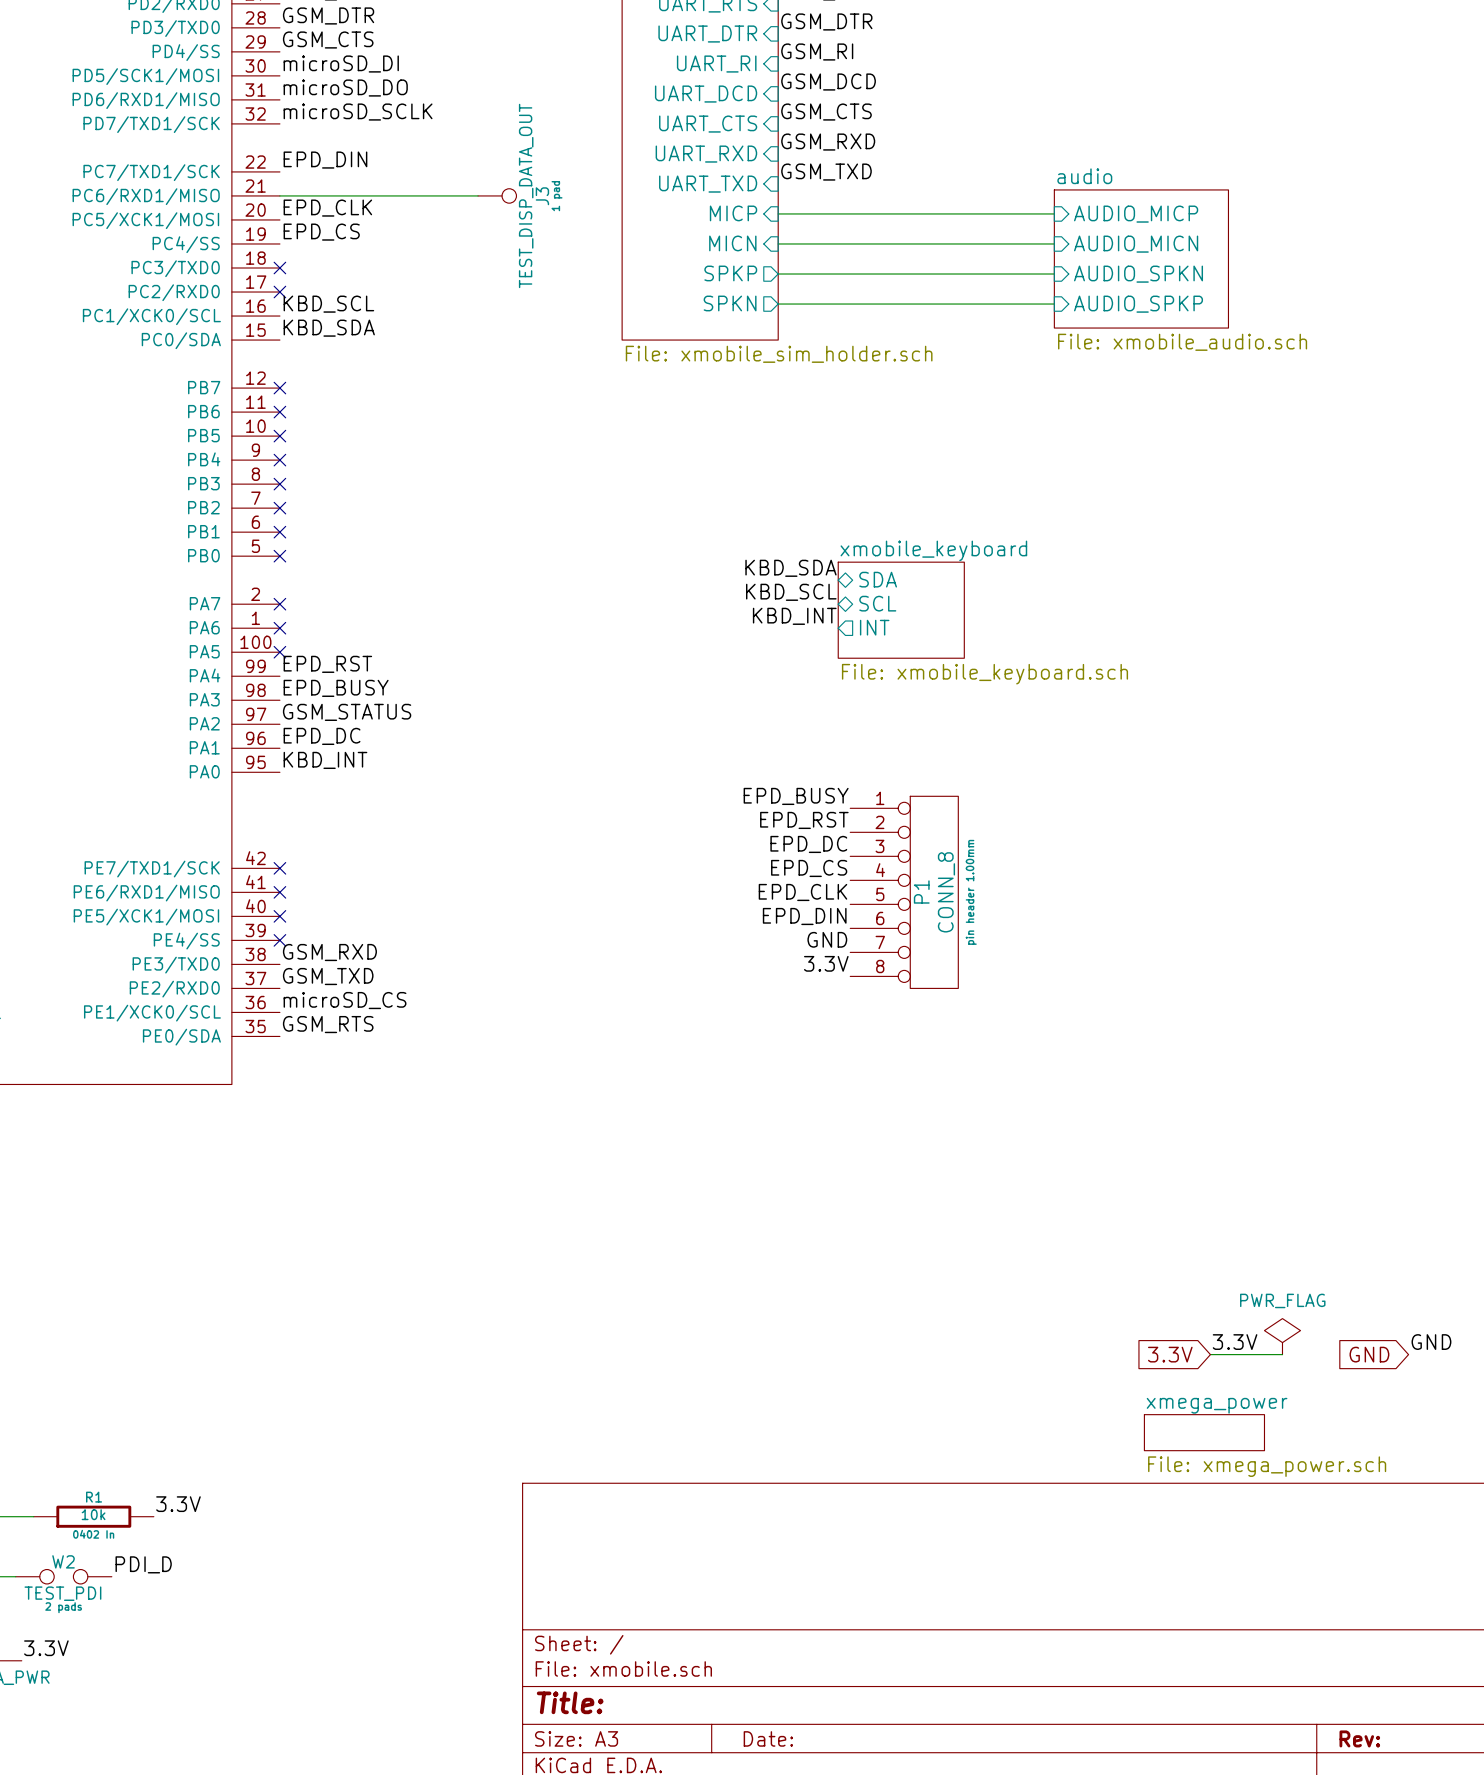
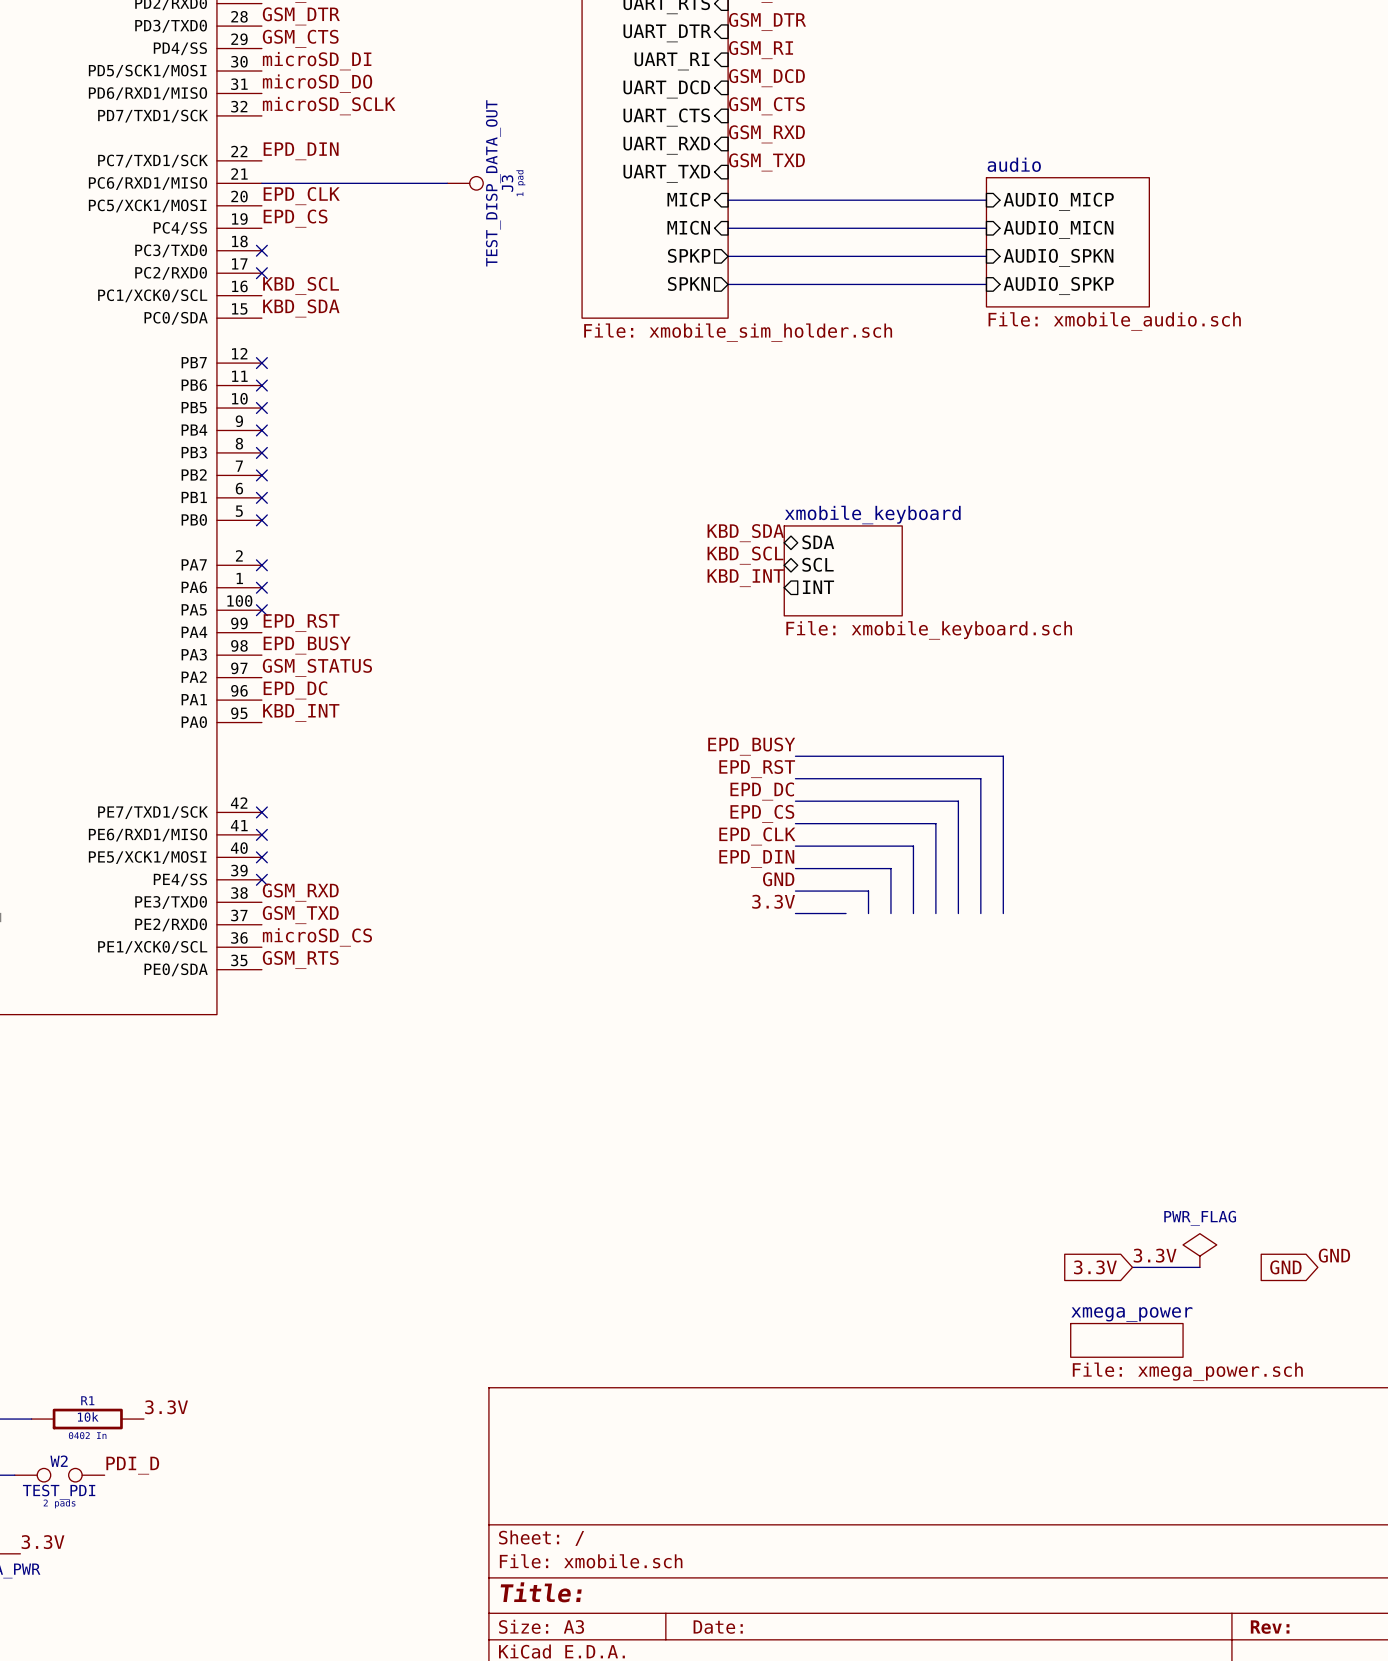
wire: none -> (795, 756) (1003, 756) (1003, 913)
wire: none -> (795, 778) (980, 778) (980, 913)
wire: none -> (795, 801) (958, 801) (958, 913)
wire: none -> (795, 823) (935, 823) (935, 913)
P1: CONN_8 (904, 892) -> none
wire: none -> (795, 846) (913, 846) (913, 913)
wire: none -> (795, 868) (890, 868) (890, 913)
wire: none -> (795, 891) (868, 891) (868, 913)

